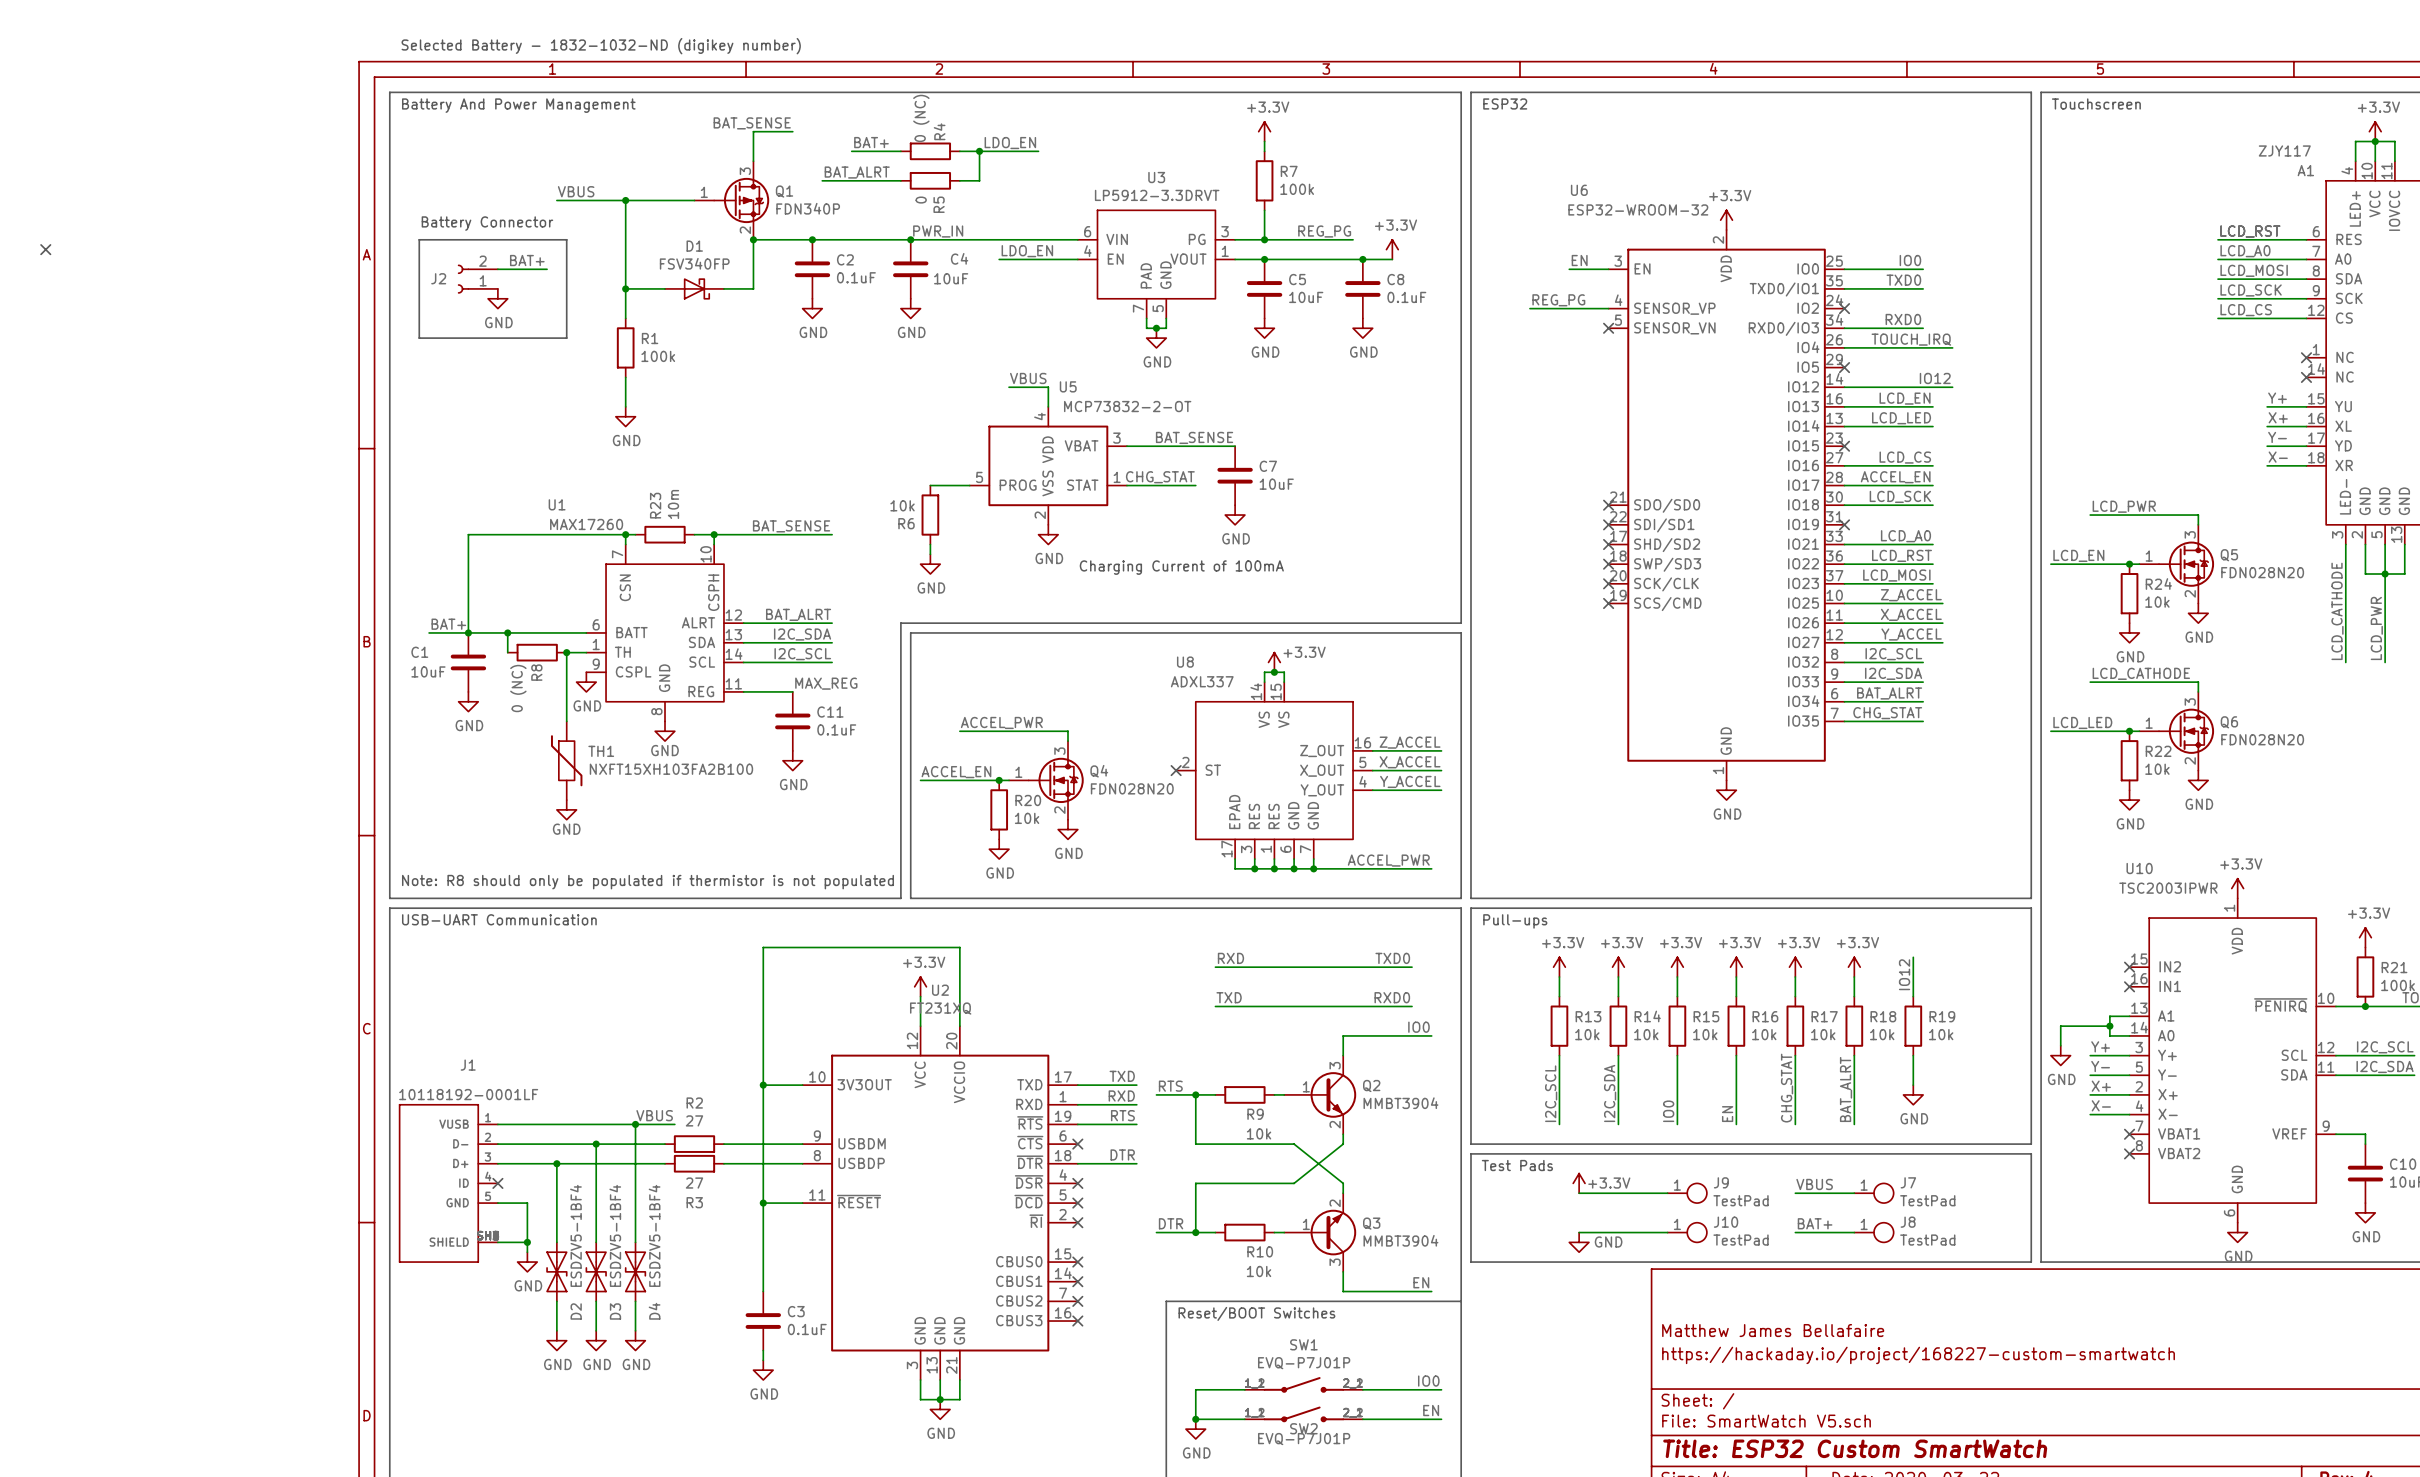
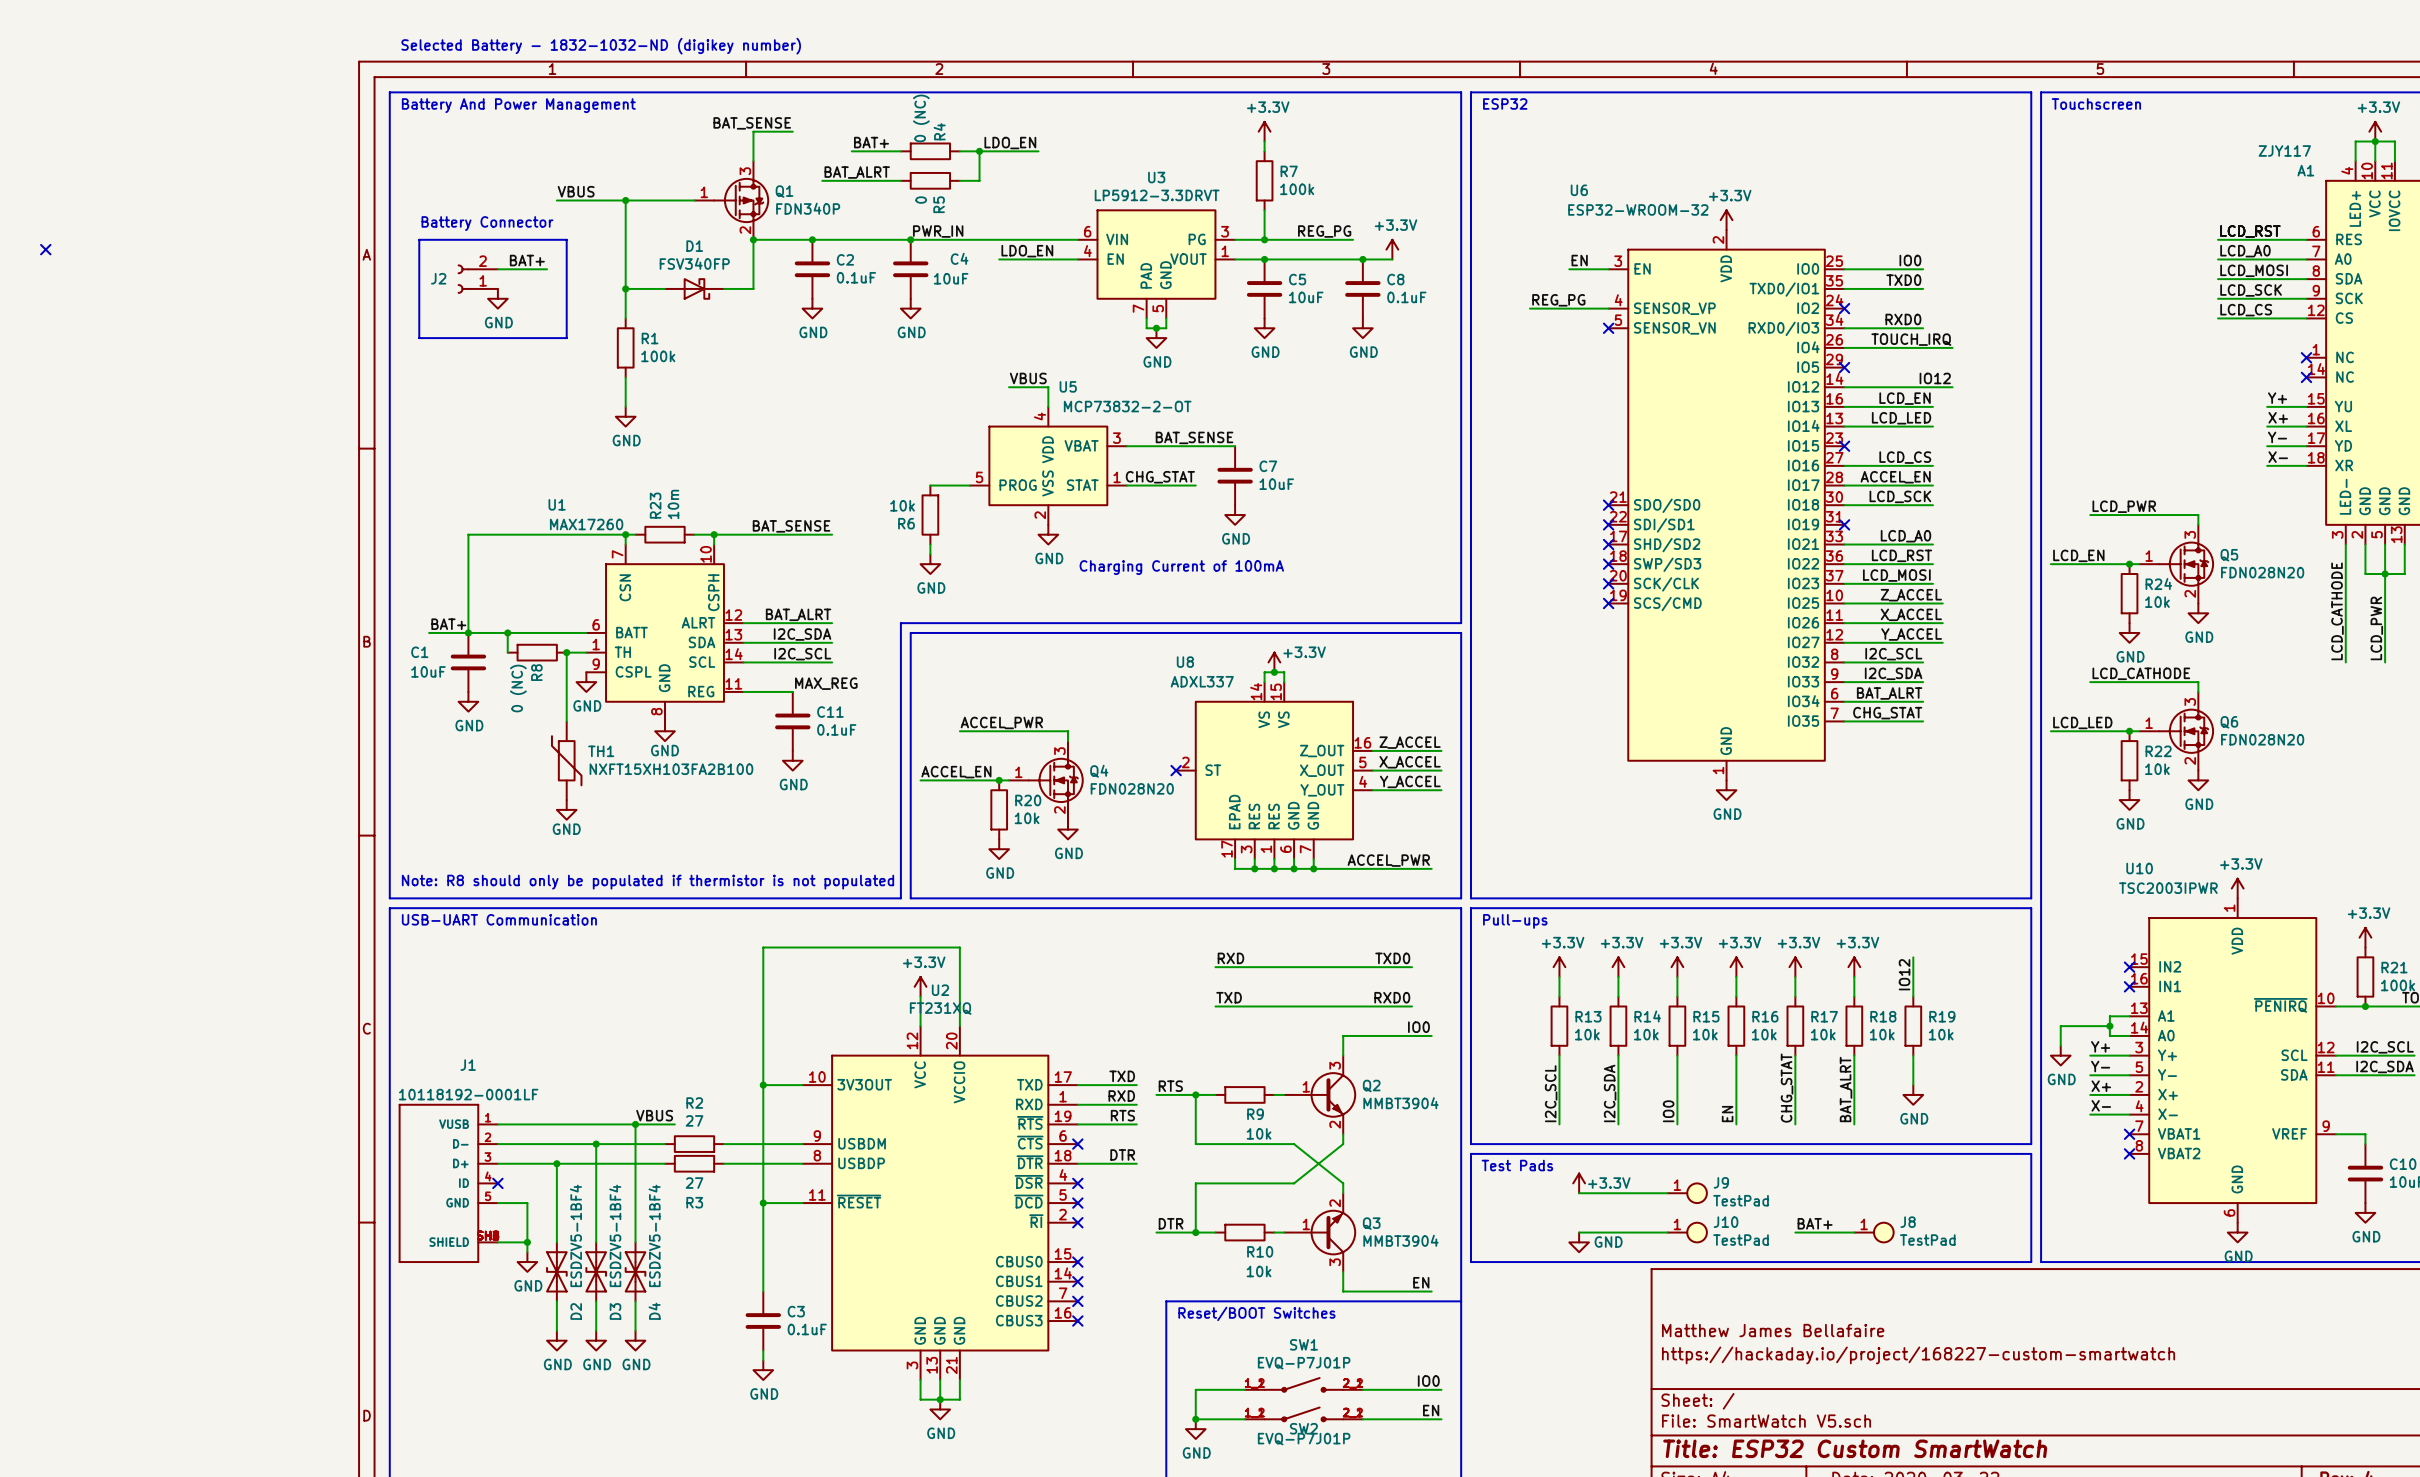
label: VBUS (1814, 1184) -> none
wire: (1795, 1193) (1854, 1193) -> none
J7: TestPad (1873, 1193) -> none

